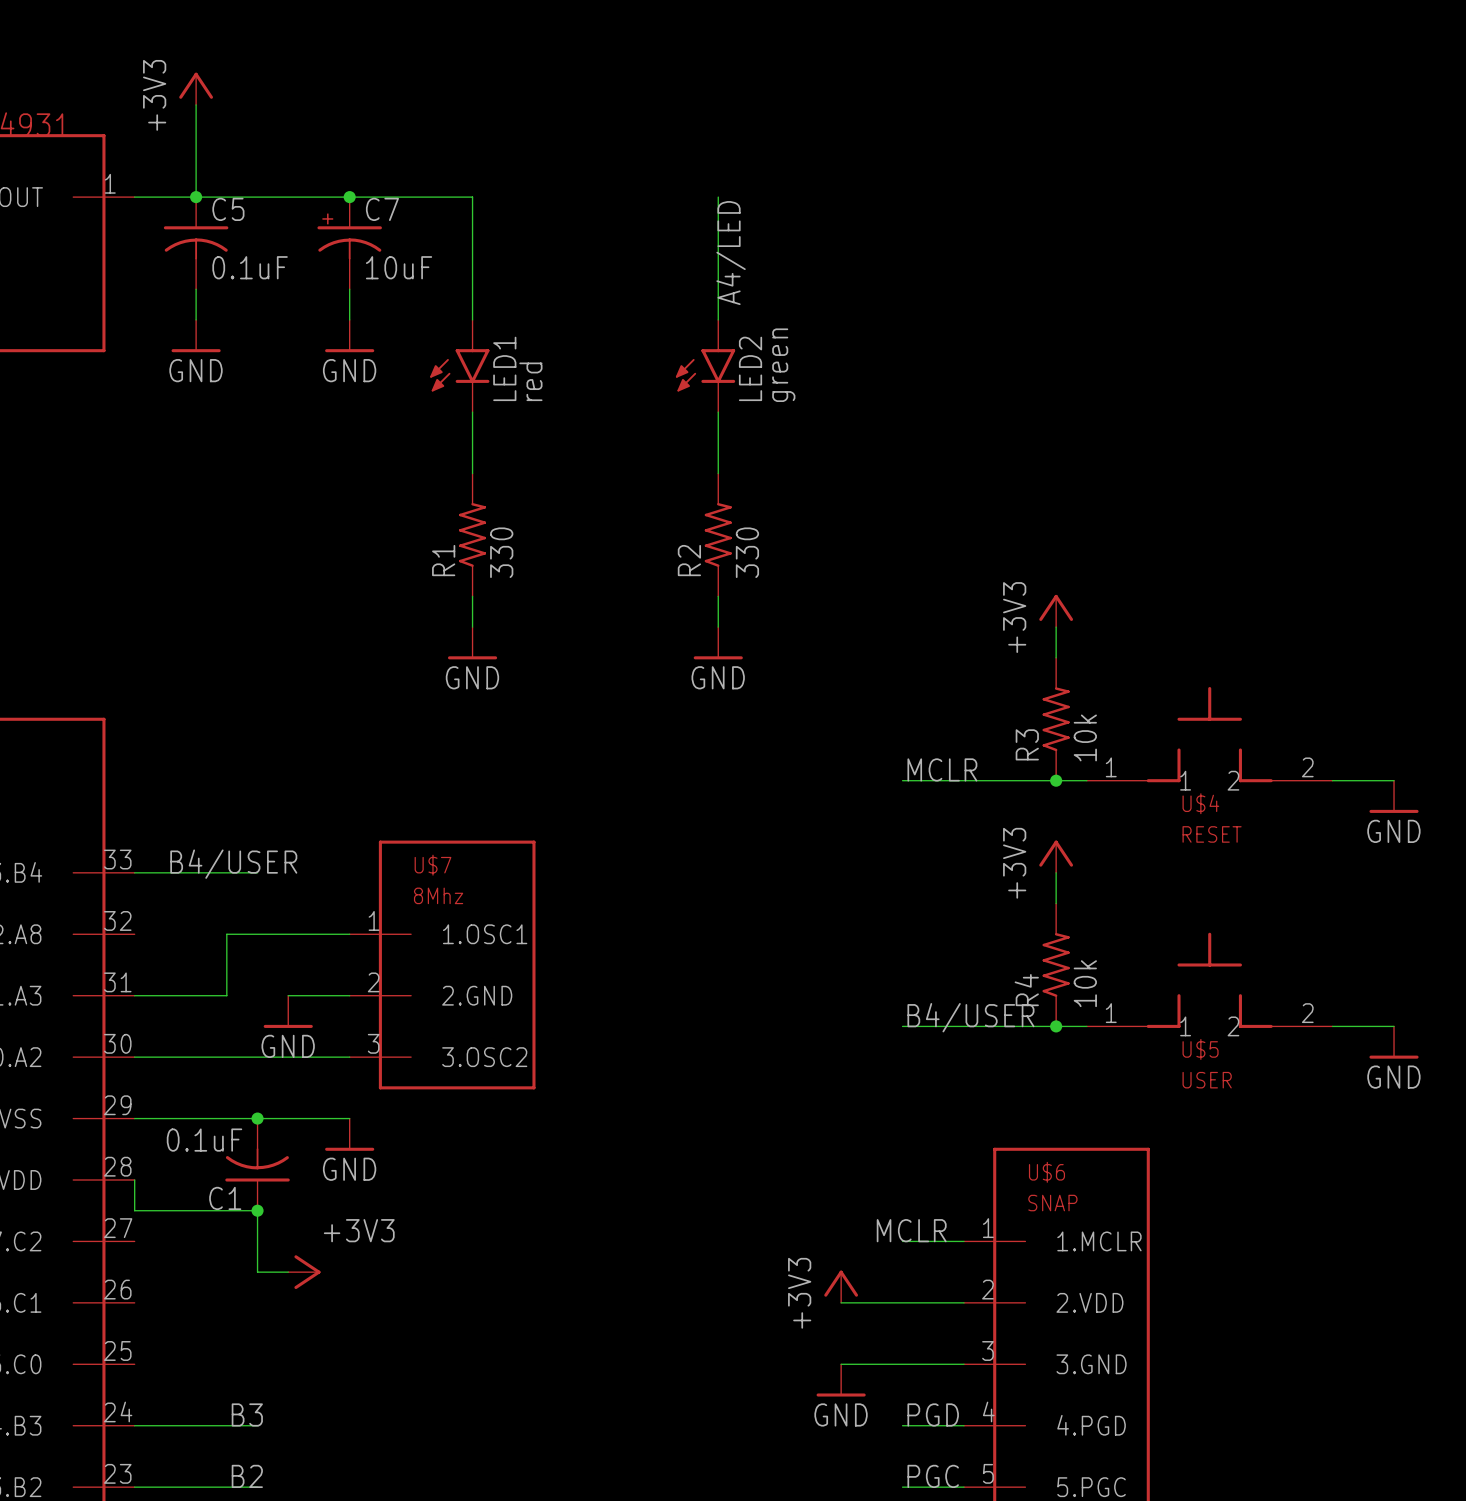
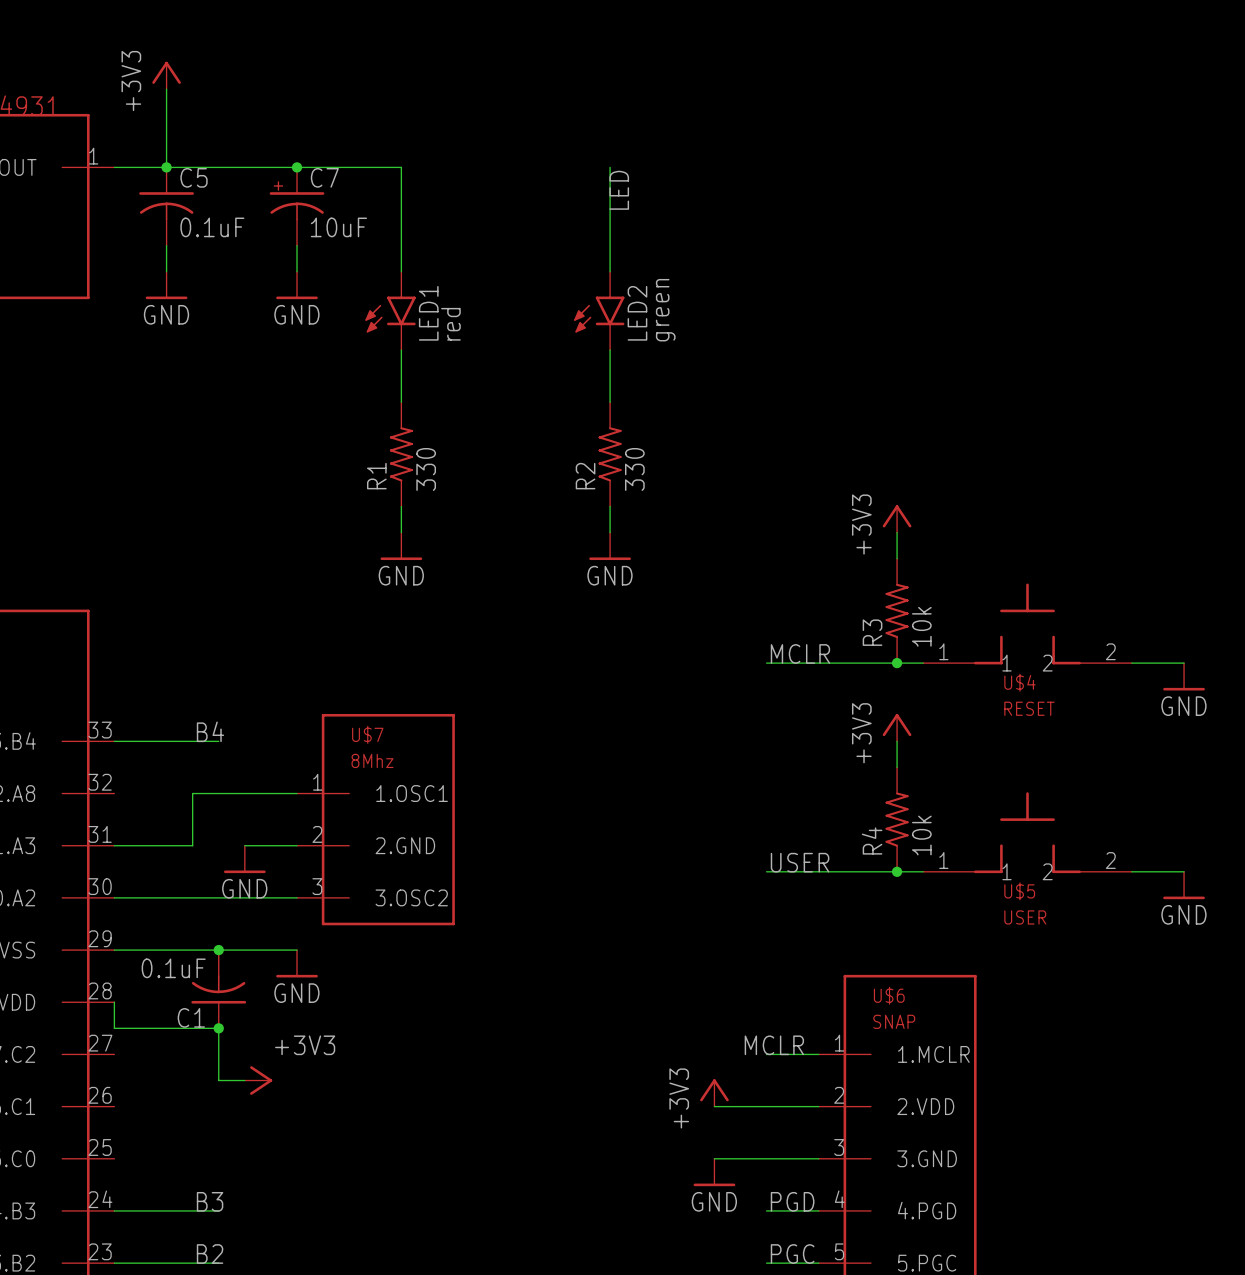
label: A4/LED (731, 253) -> LED (619, 190)
label: none -> B4 (210, 731)
label: B4/USER (233, 864) -> none
label: B4/USER (970, 1017) -> USER (800, 862)

